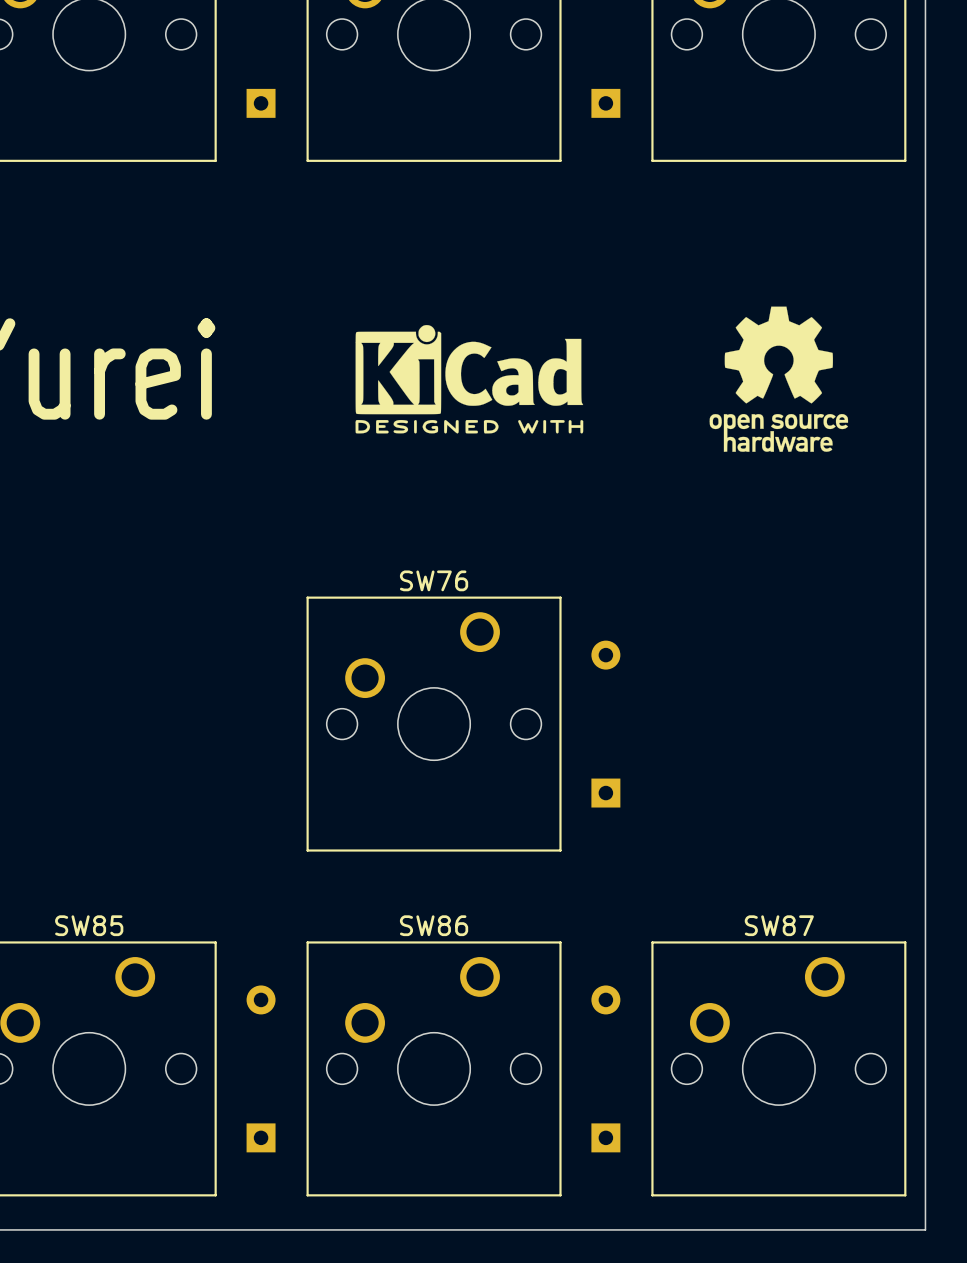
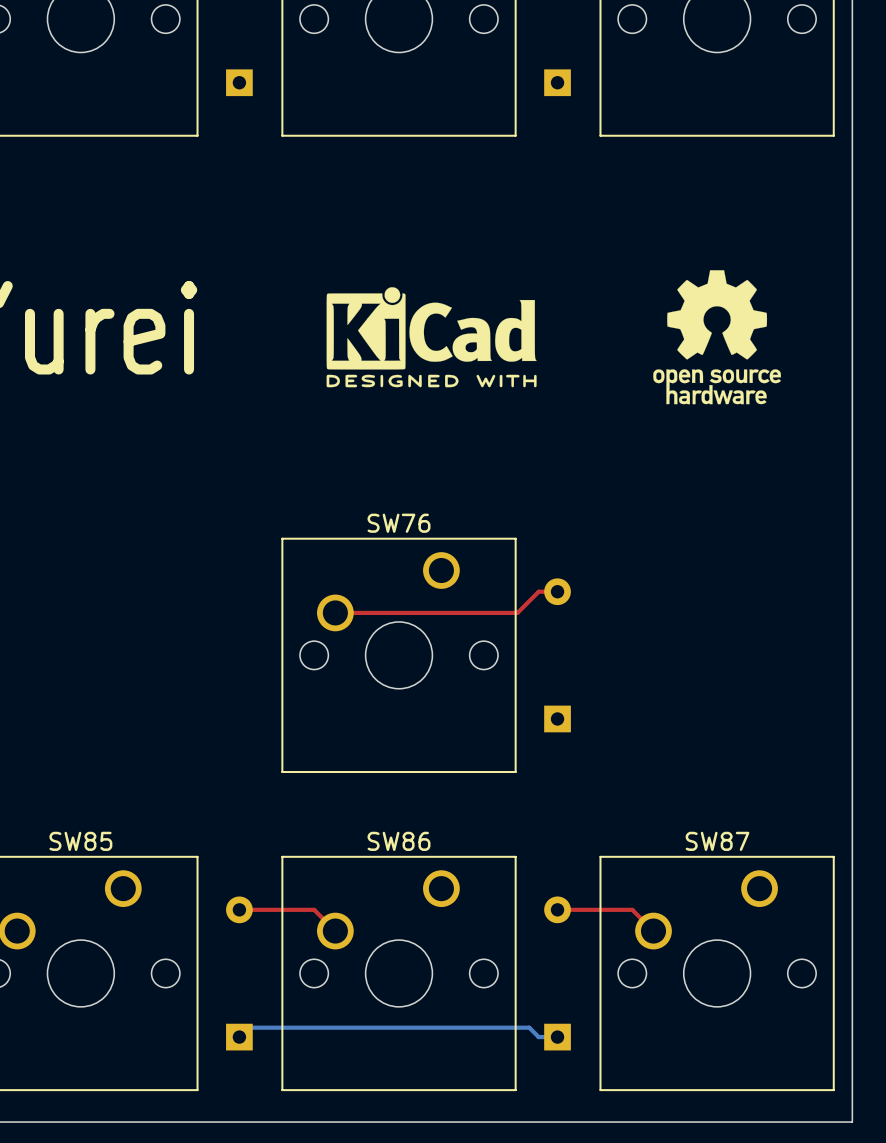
top track: none -> (557, 591) (538, 591) (517, 612) (335, 612)
top track: none -> (239, 909) (314, 909) (335, 931)
top track: none -> (557, 909) (632, 909) (653, 931)
bottom track: none -> (239, 1027) (529, 1027) (538, 1037) (557, 1037)

